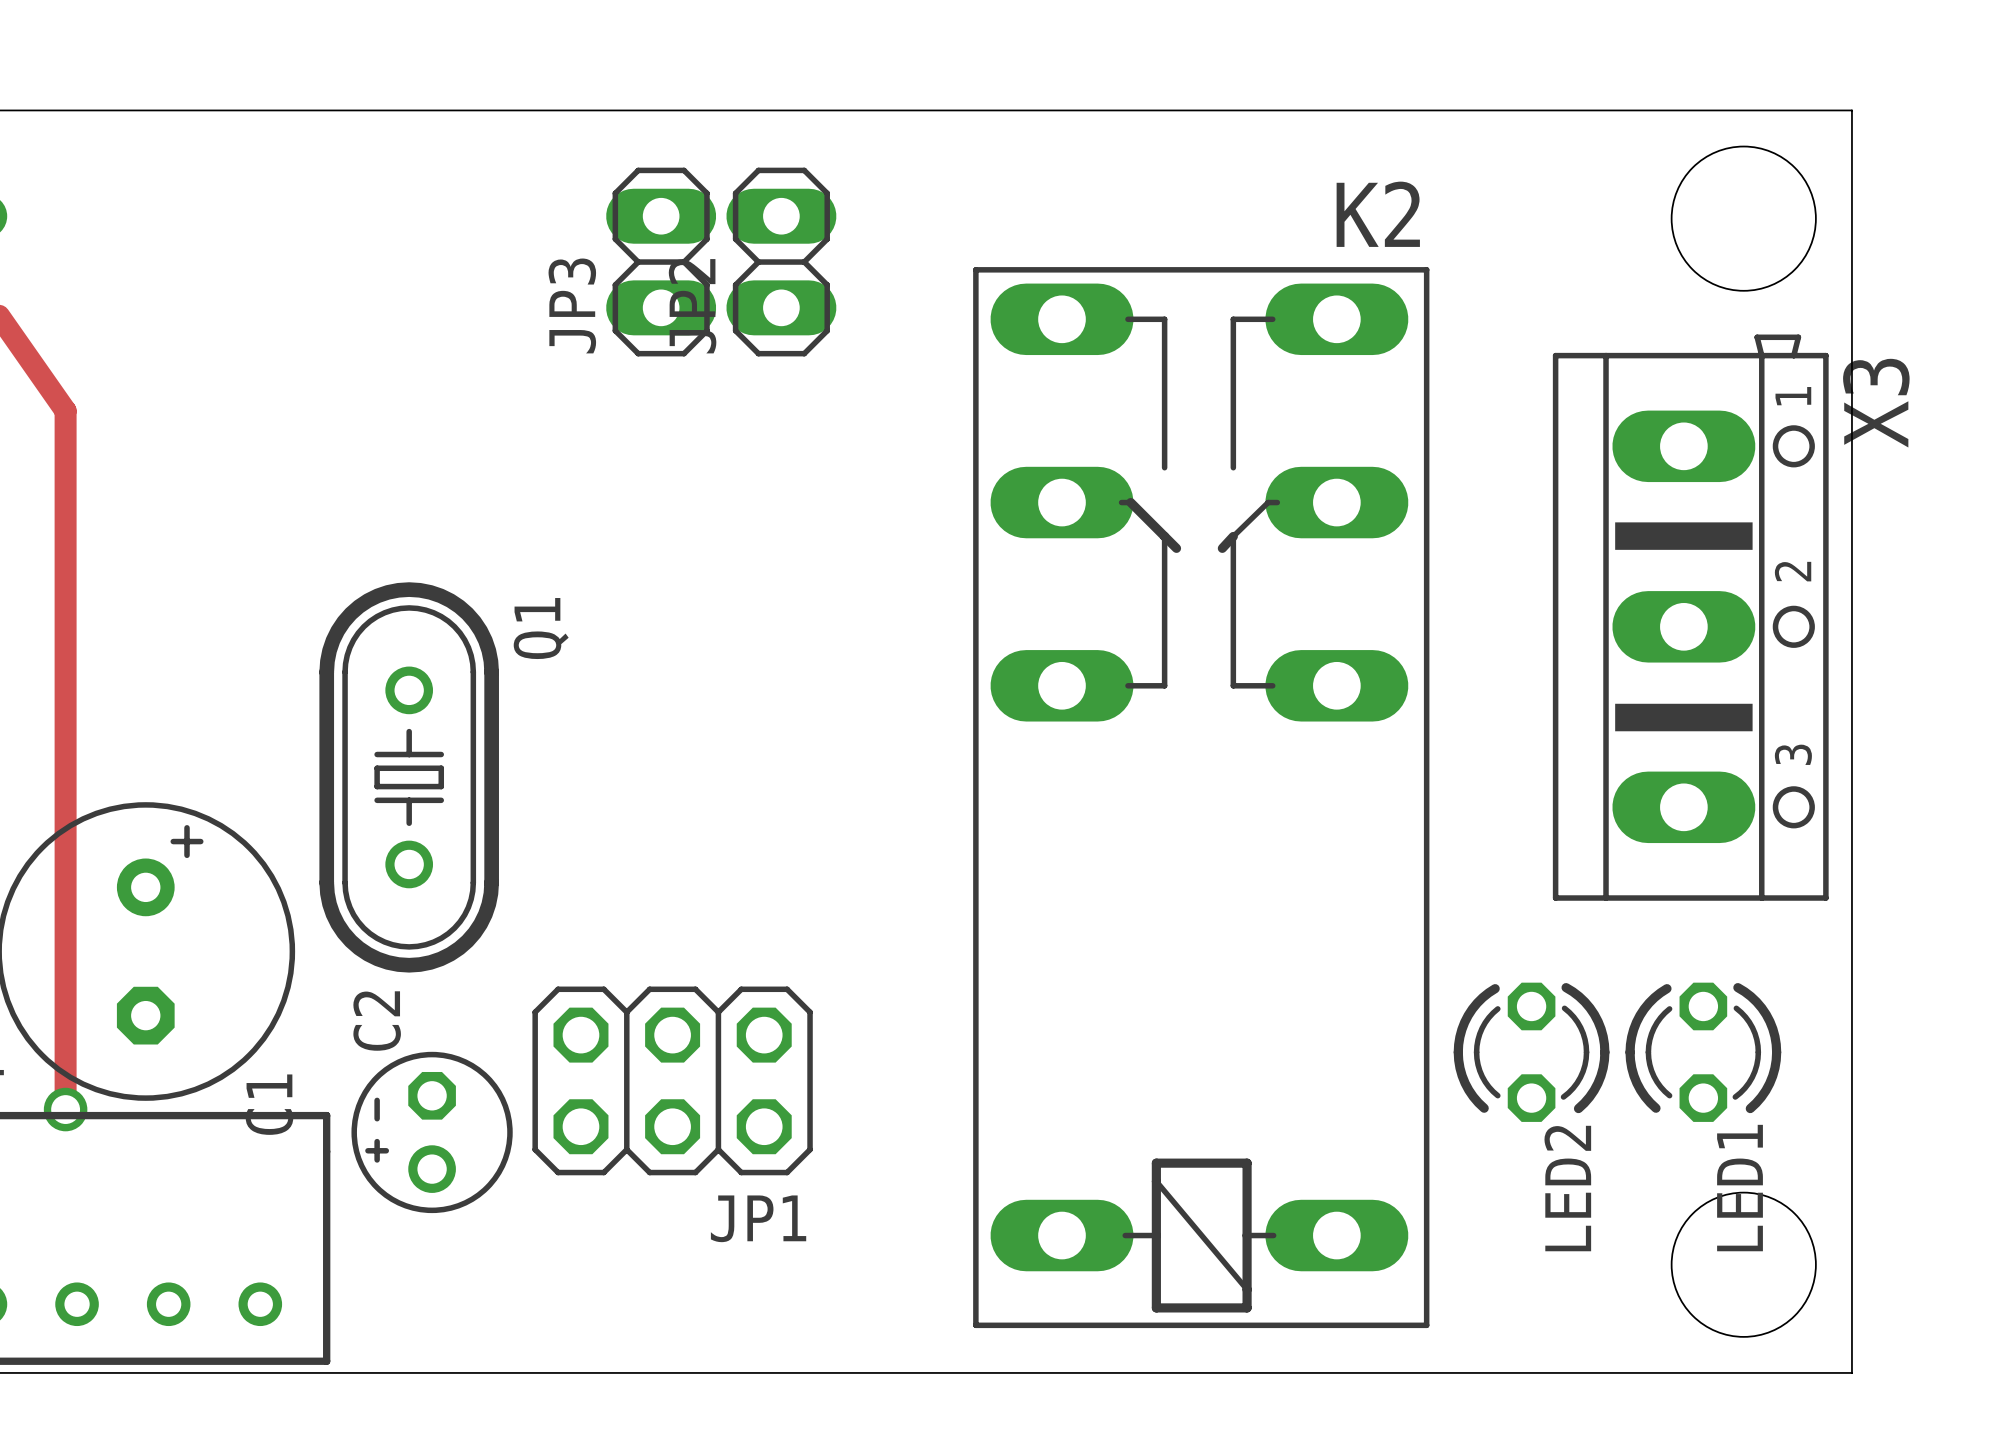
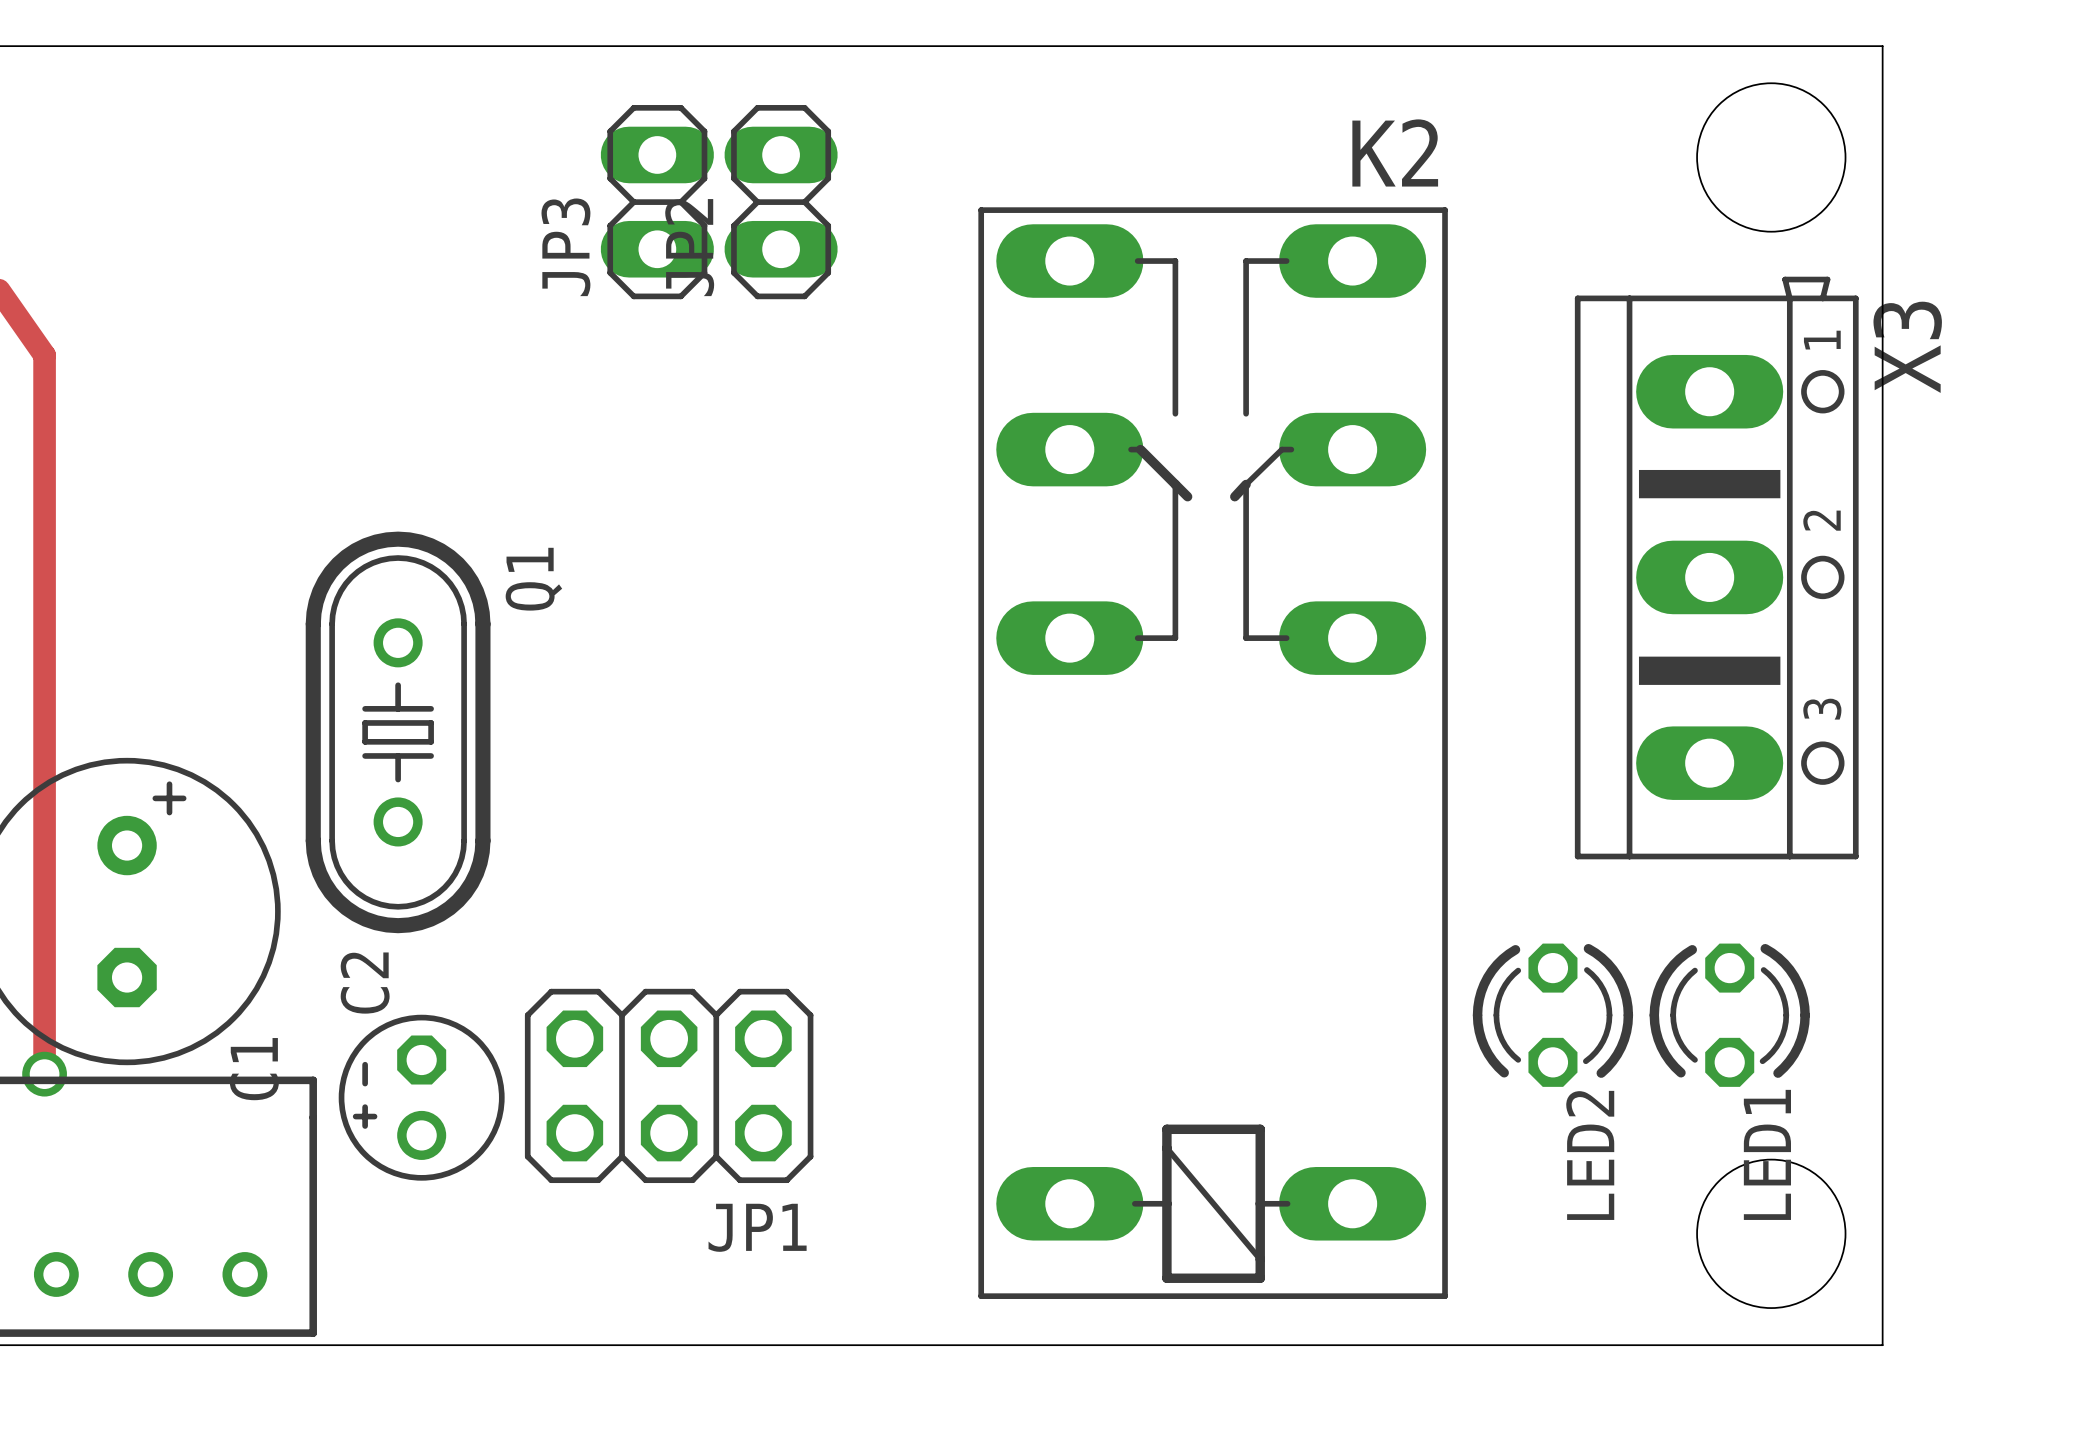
JP1 position: (672, 1080) -> (669, 1085)

